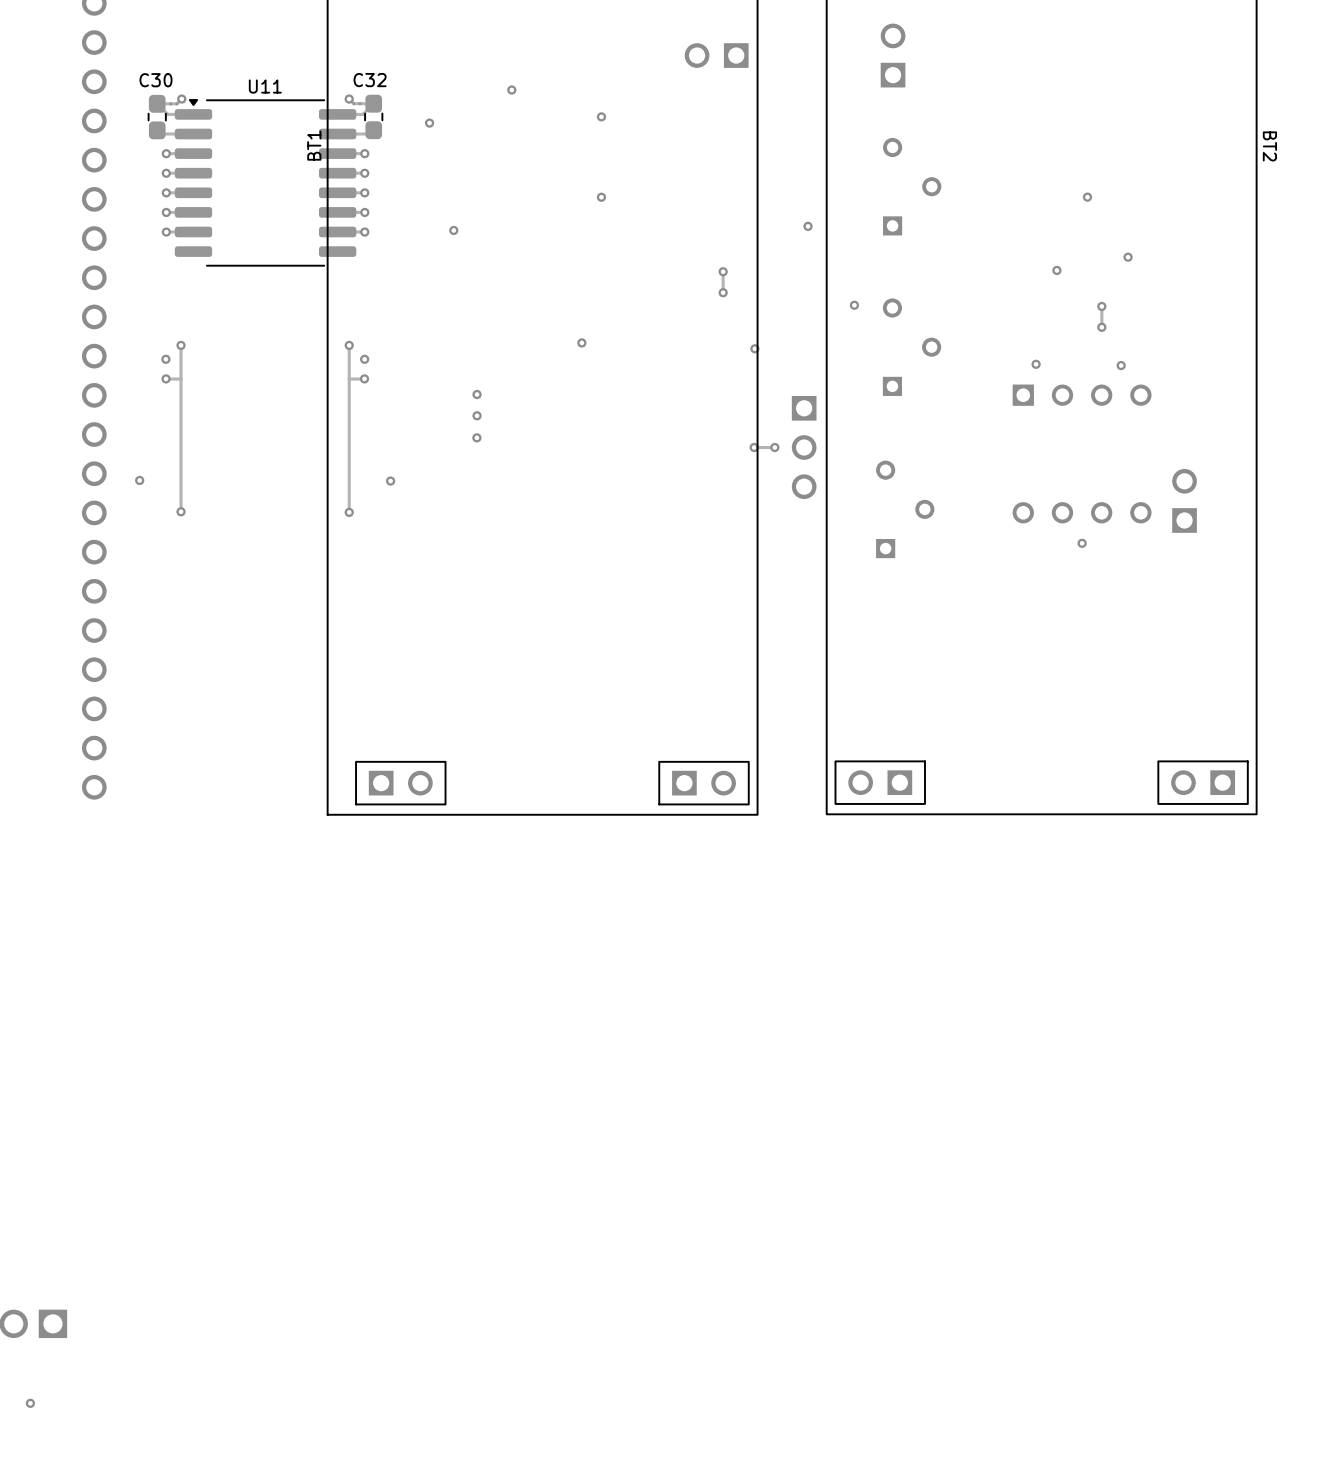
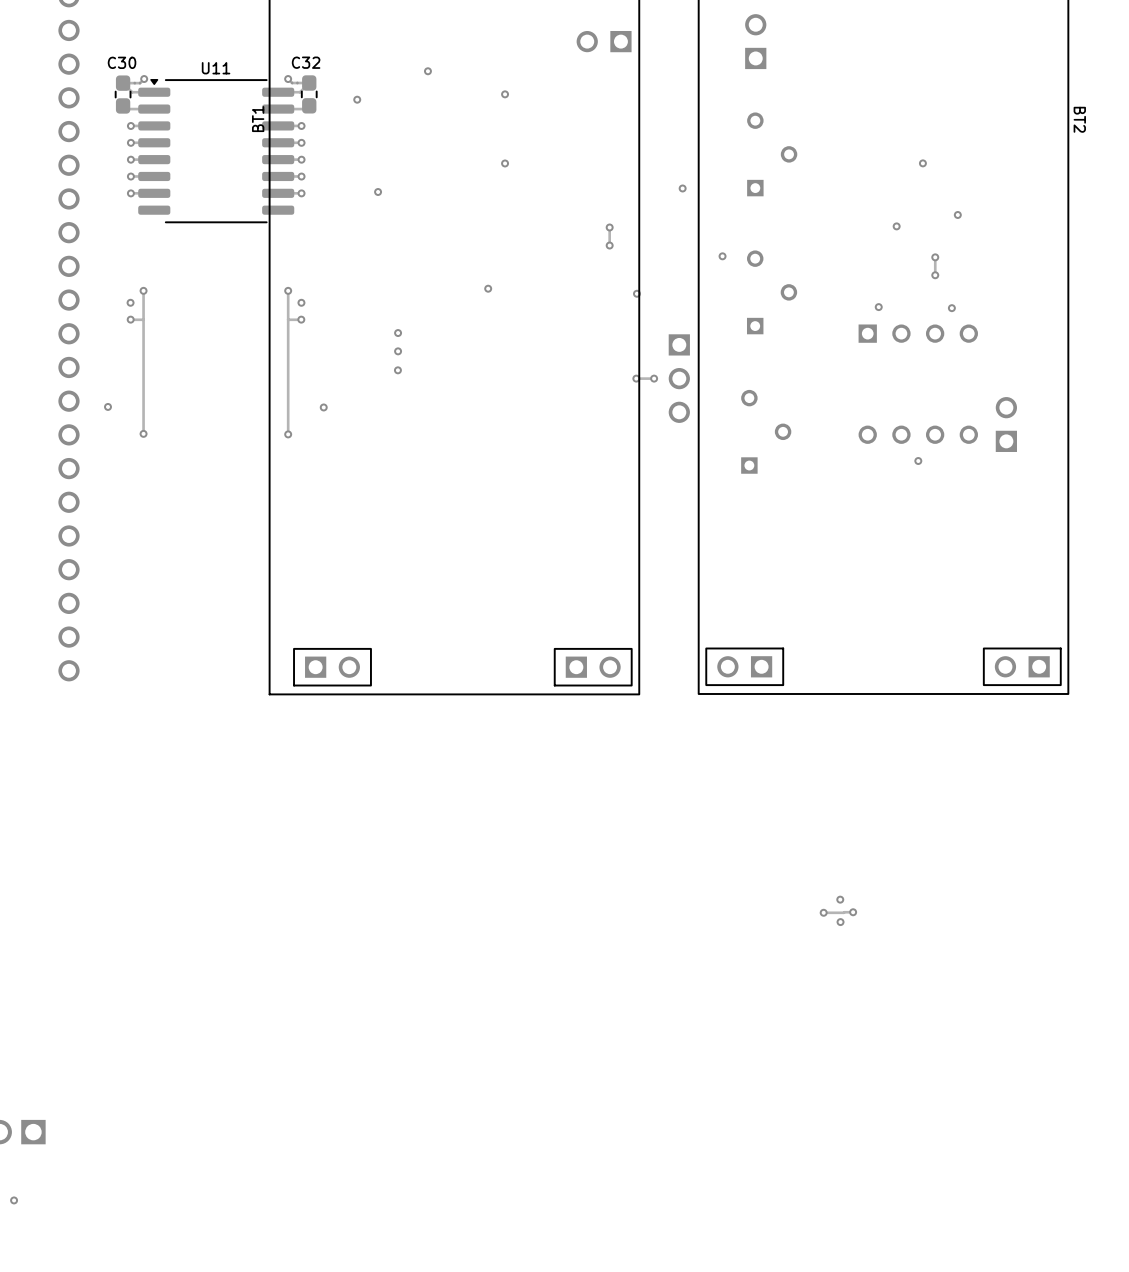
via: none -> (840, 899)
via: none -> (823, 912)
track: none -> (853, 912) (823, 912)
via: none -> (853, 912)
via: none -> (840, 922)

